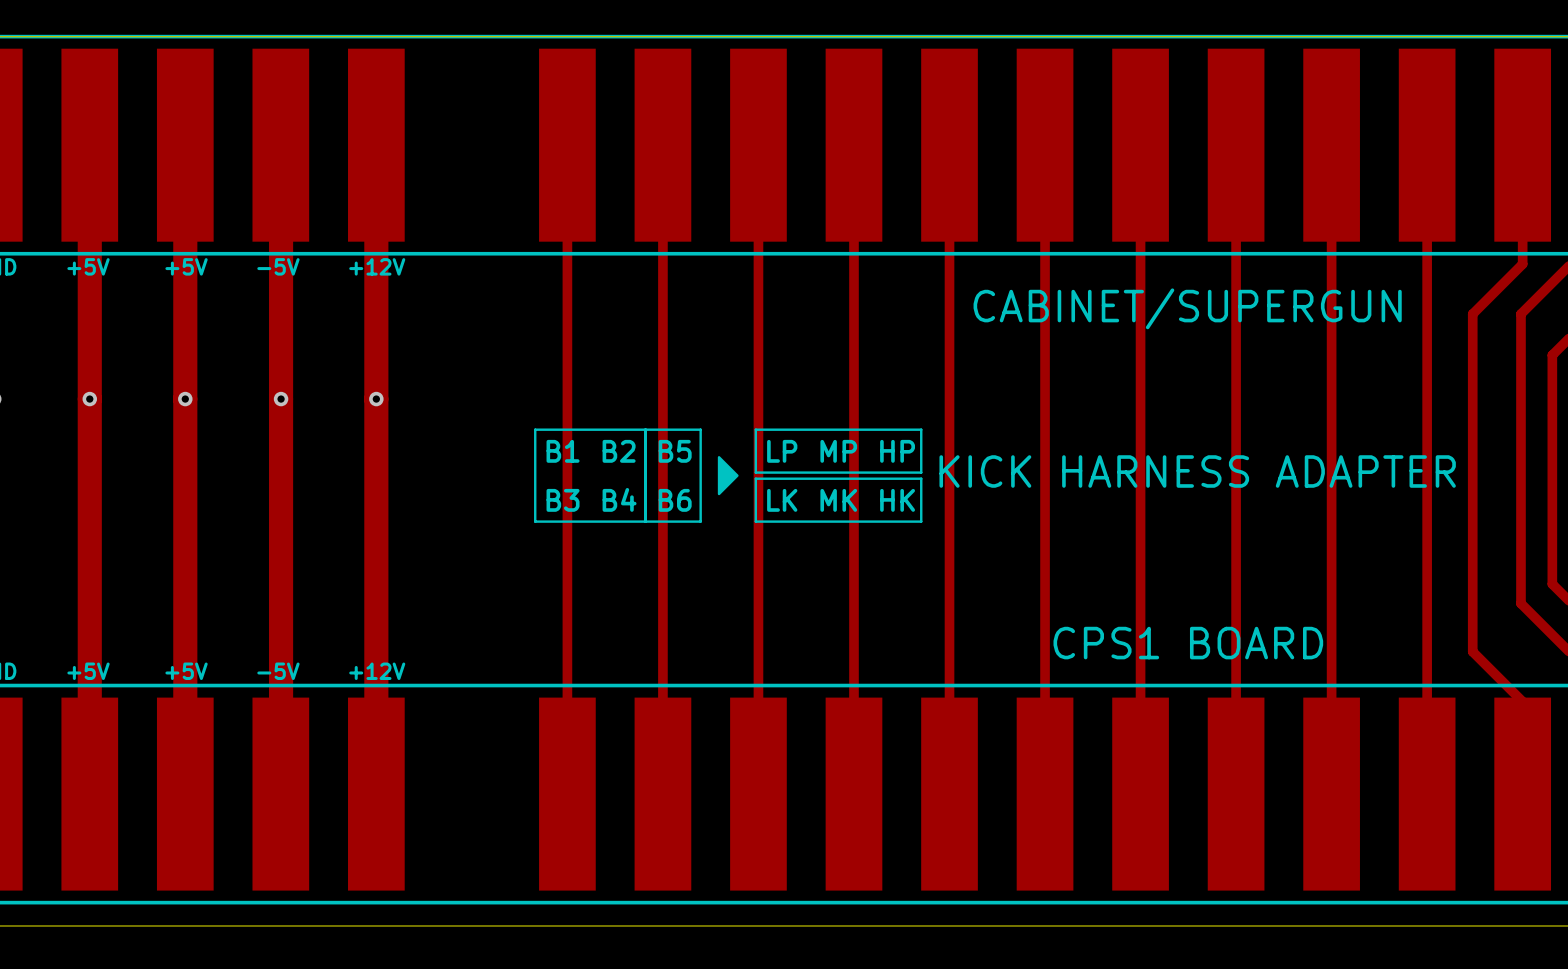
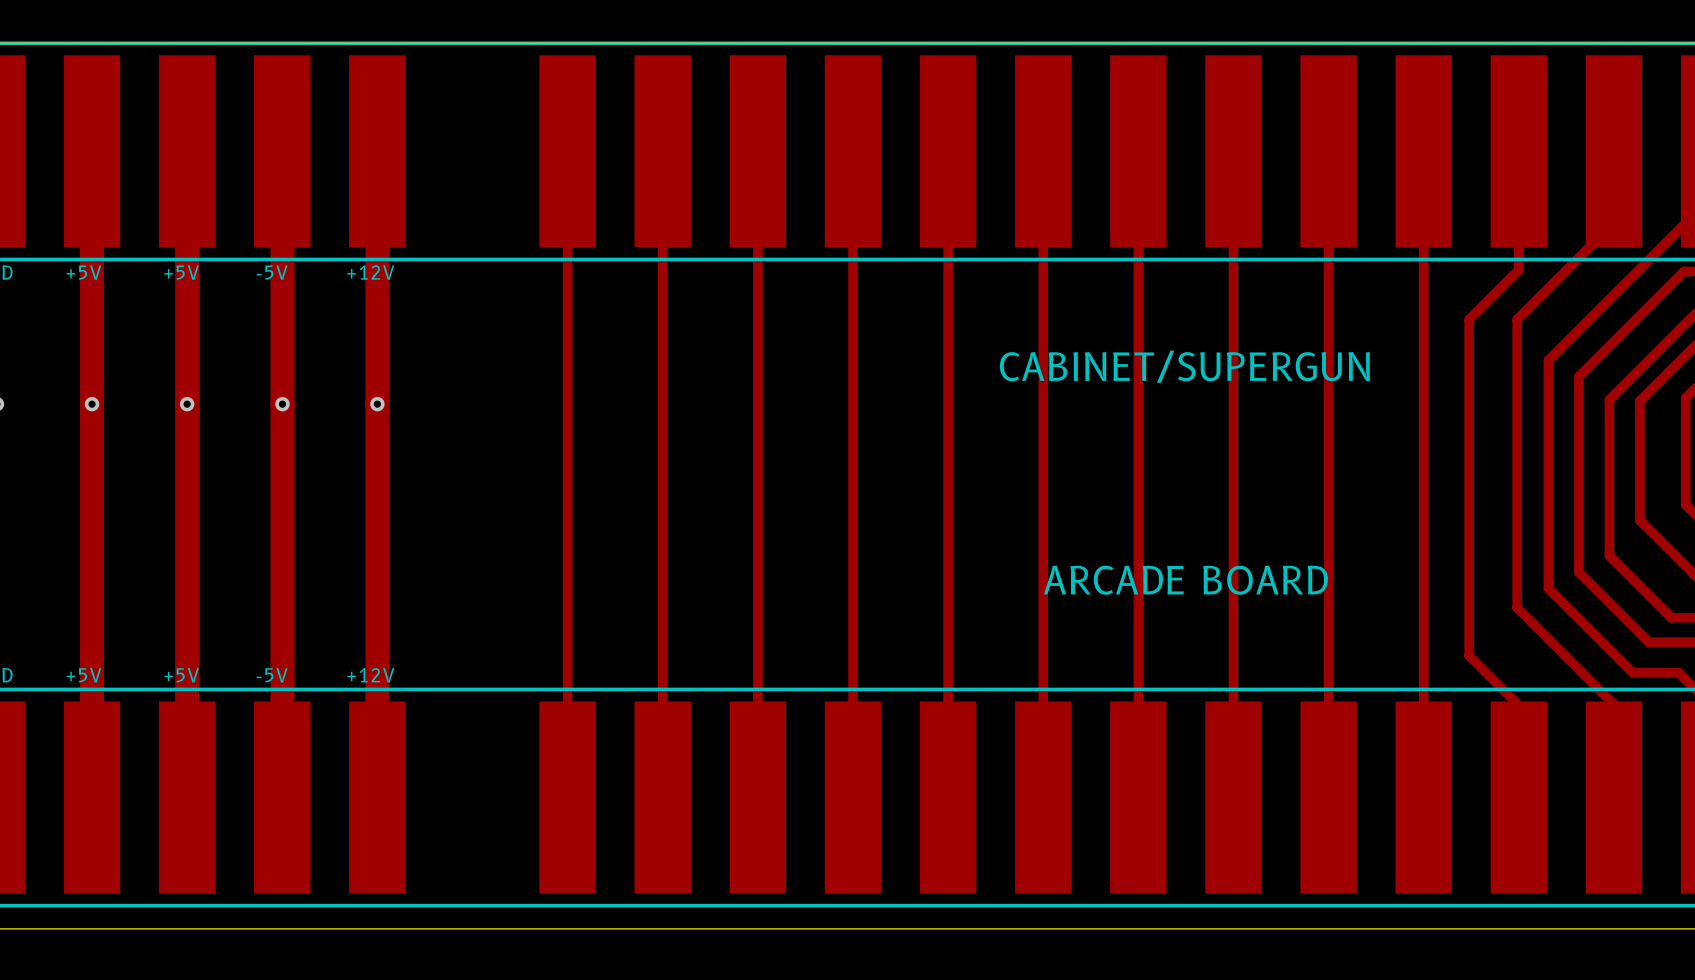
CABINET/SUPERGUN name position: CABINET/SUPERGUN (1187, 308) -> CABINET/SUPERGUN (1184, 366)
line: (535, 429) (700, 429) (700, 521) (535, 521) (535, 429) -> none
line: (645, 429) (645, 521) -> none
line: (755, 429) (921, 429) (921, 472) (755, 472) (755, 429) -> none
text: B1 B2 B5 (619, 451) -> none
text: LP MP HP (841, 451) -> none
drawing: [717, 456, 739, 496] -> none
text: KICK HARNESS ADAPTER (1197, 471) -> none
line: (755, 478) (755, 521) (921, 521) (921, 478) (755, 478) -> none
text: B3 B4 B6 (619, 499) -> none
text: LK MK HK (841, 500) -> none
CPS1 BOARD name: CPS1 BOARD (1188, 643) -> ARCADE BOARD (1185, 580)

